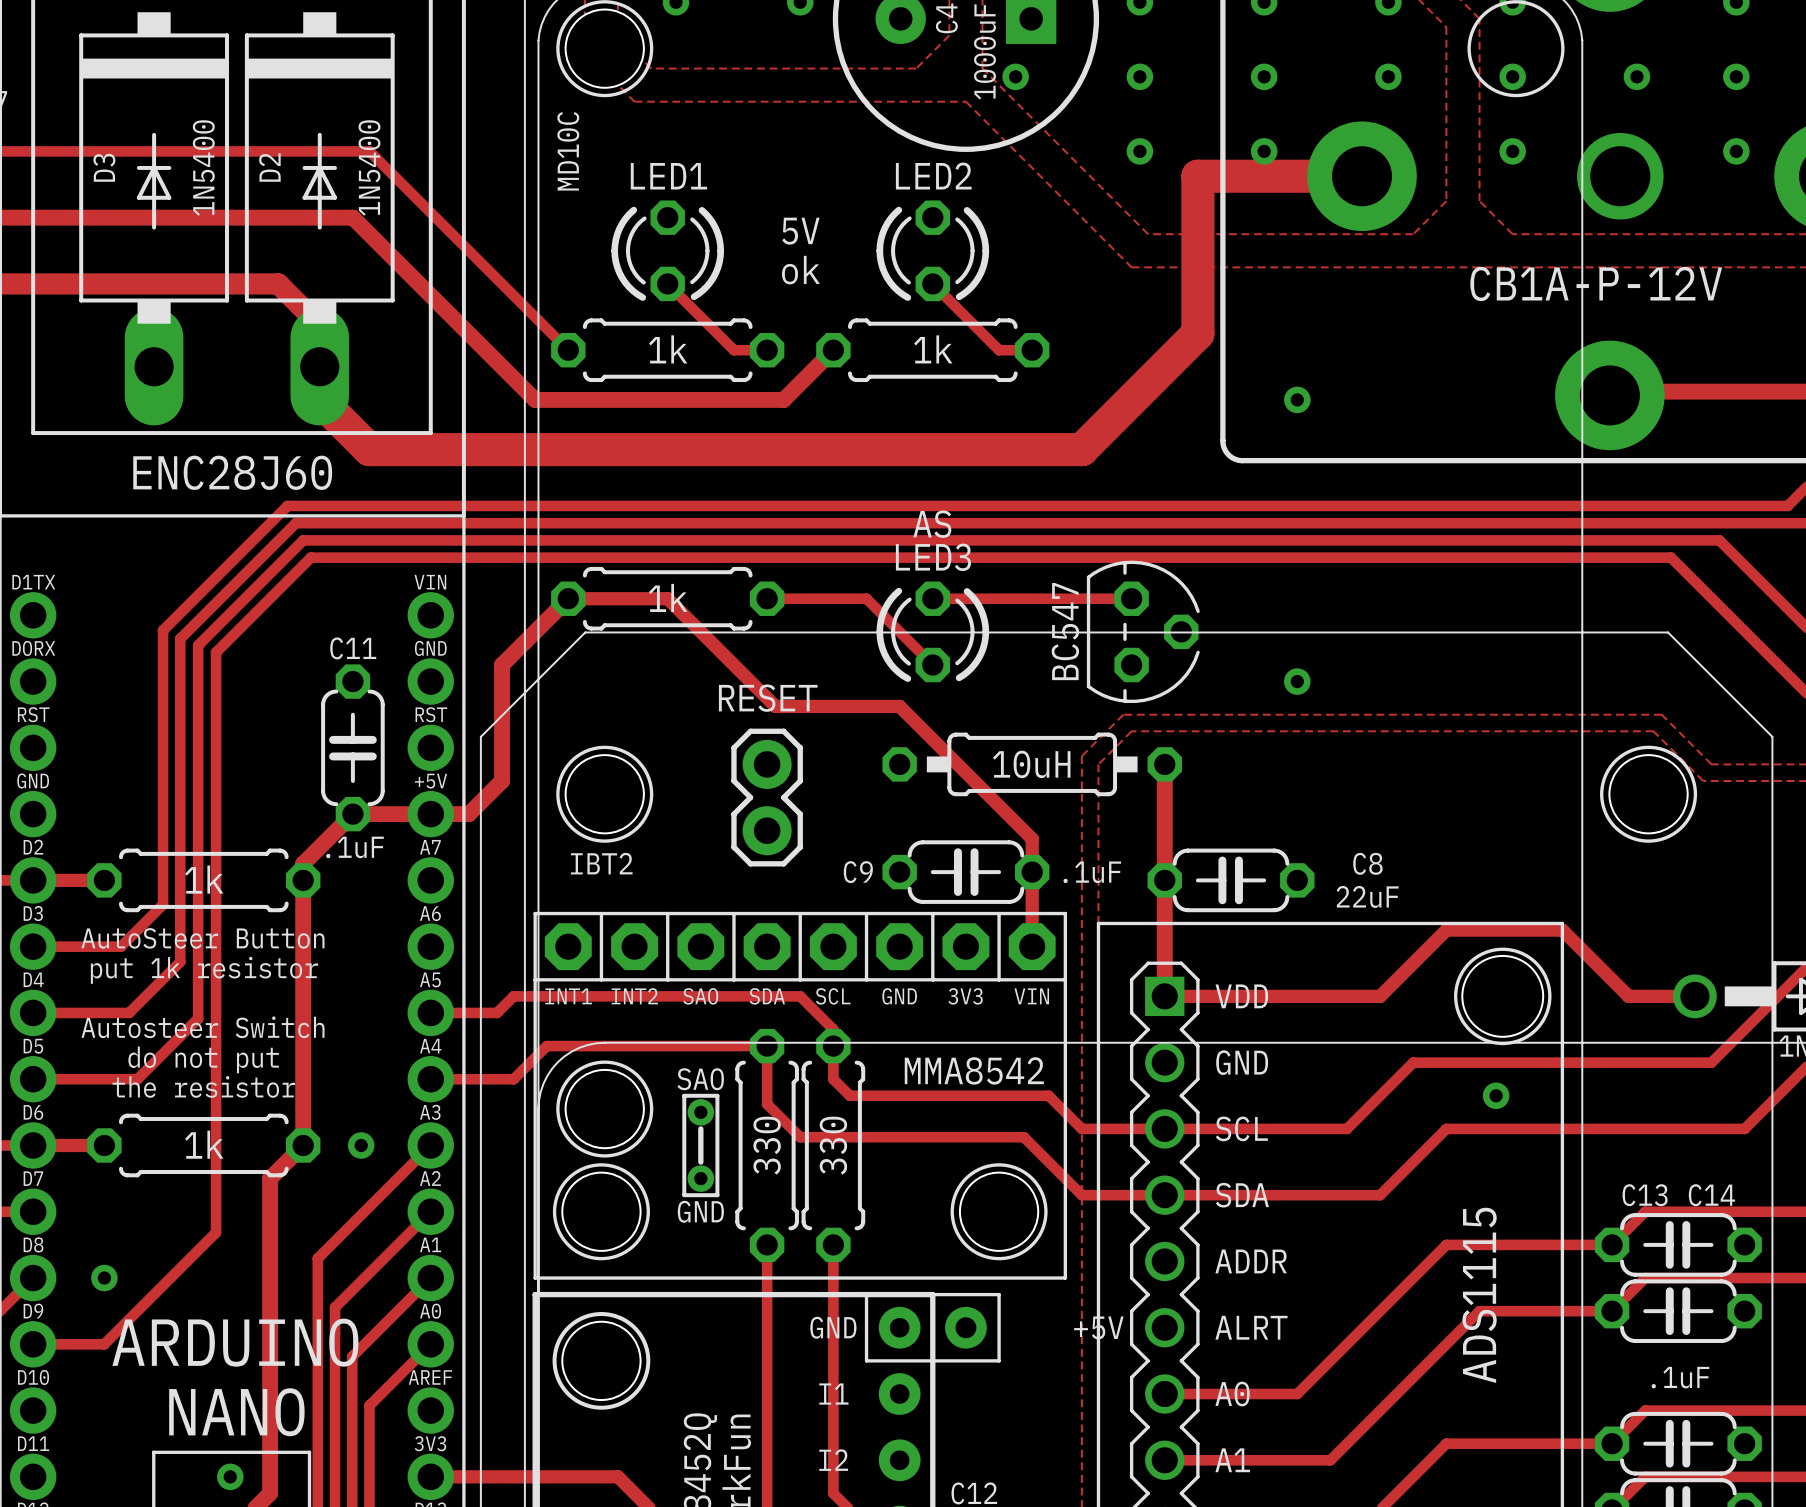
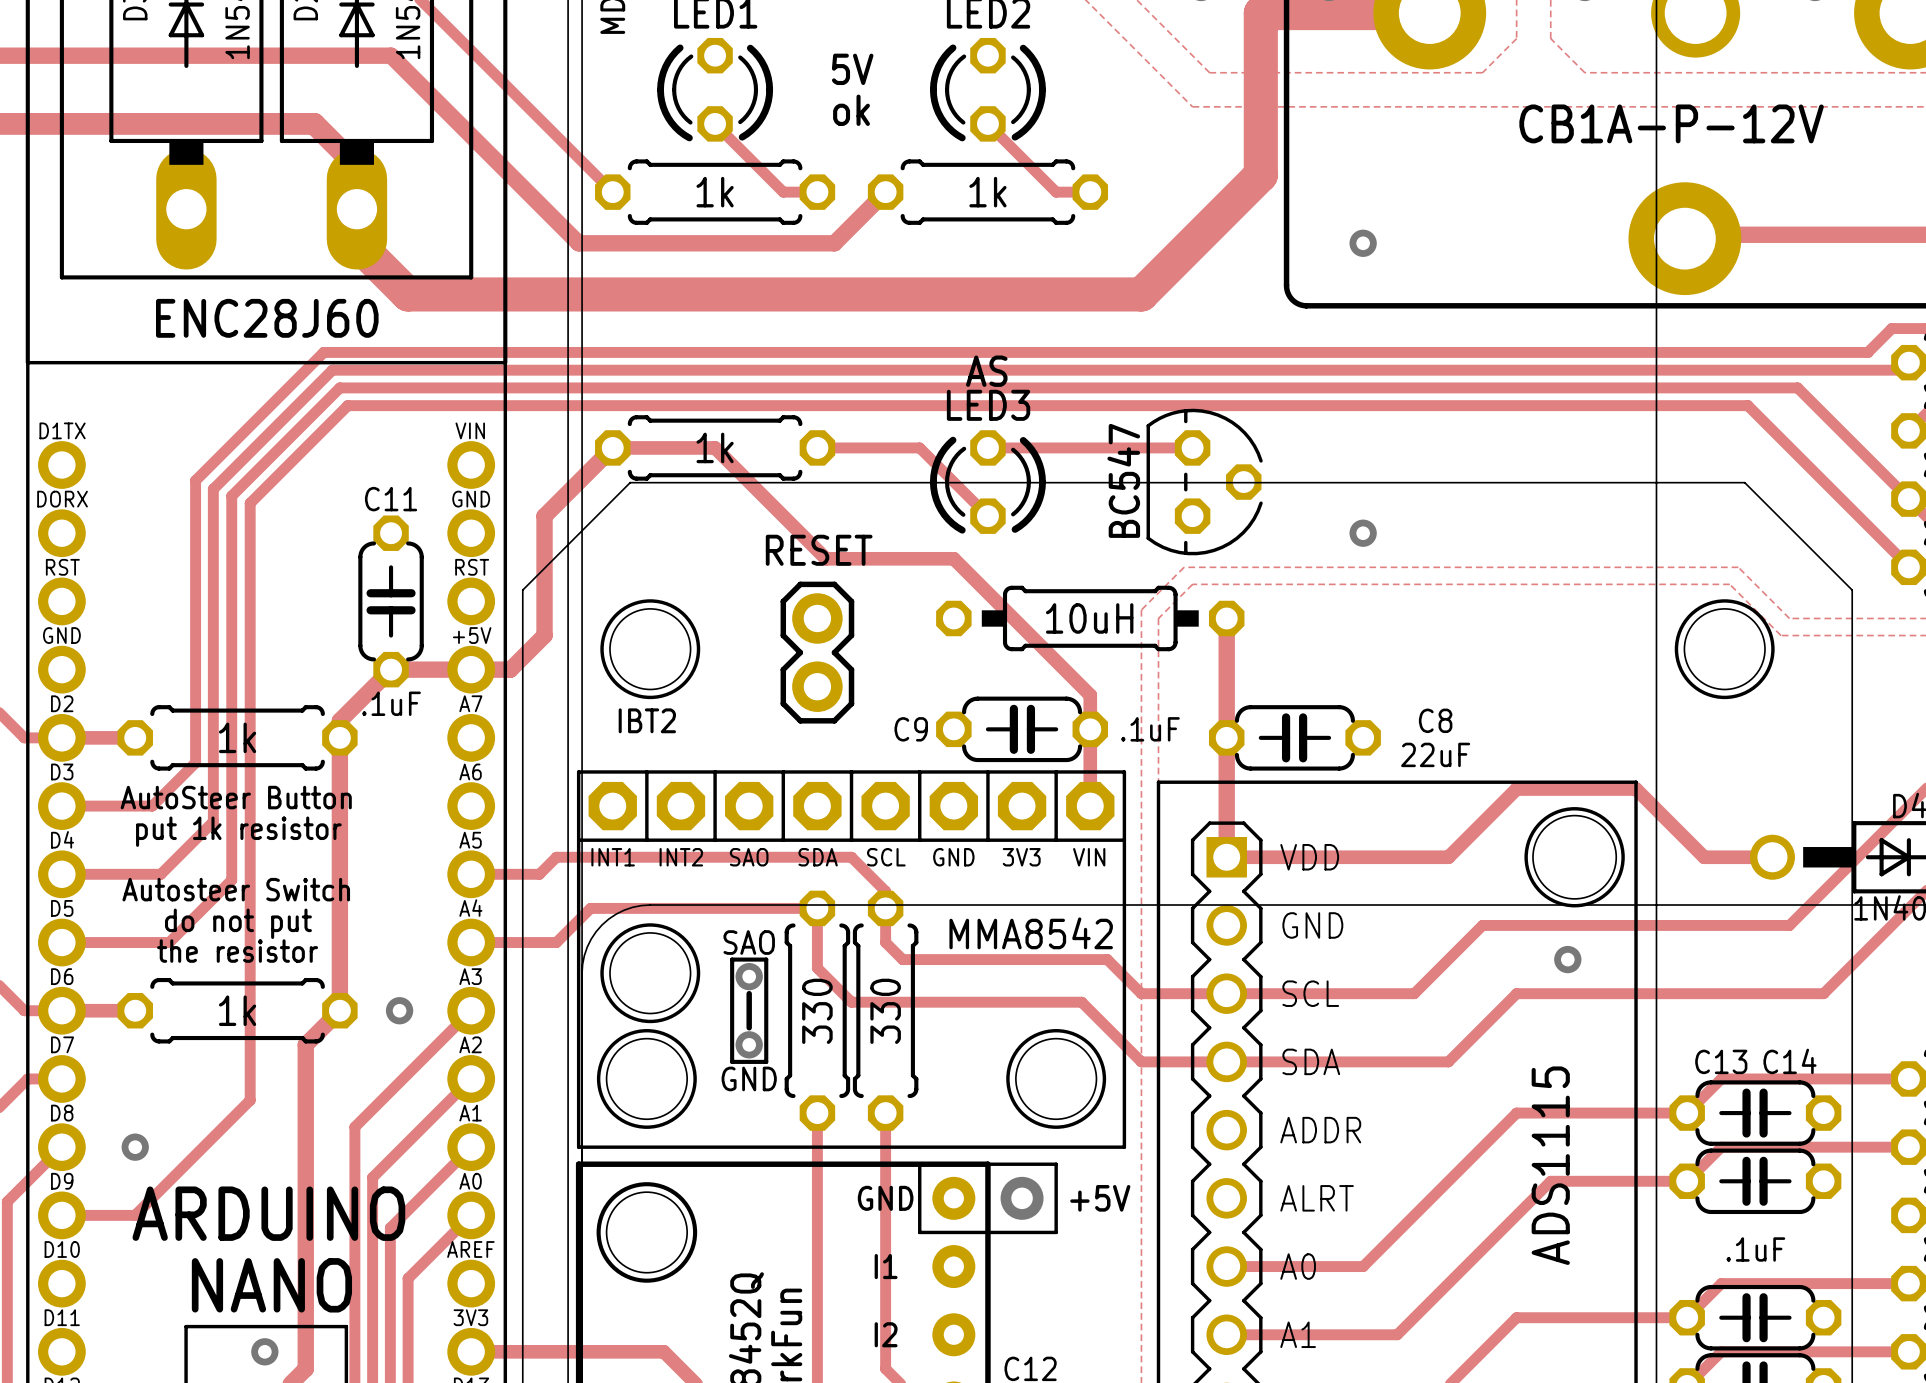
text position: +5V (1098, 1327) -> +5V (1100, 1198)

